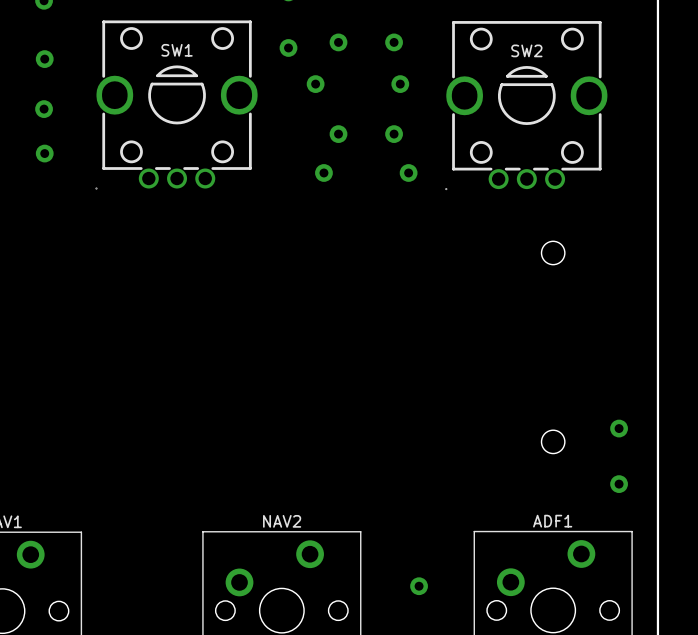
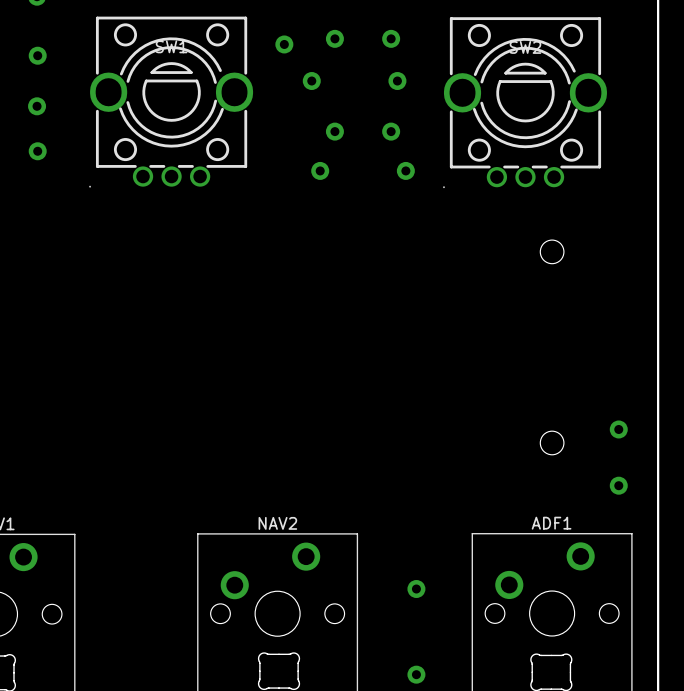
SW1 footprint: [95, 20, 258, 190] -> [89, 16, 254, 188]
SW2 footprint: [445, 21, 608, 190] -> [443, 17, 607, 188]

